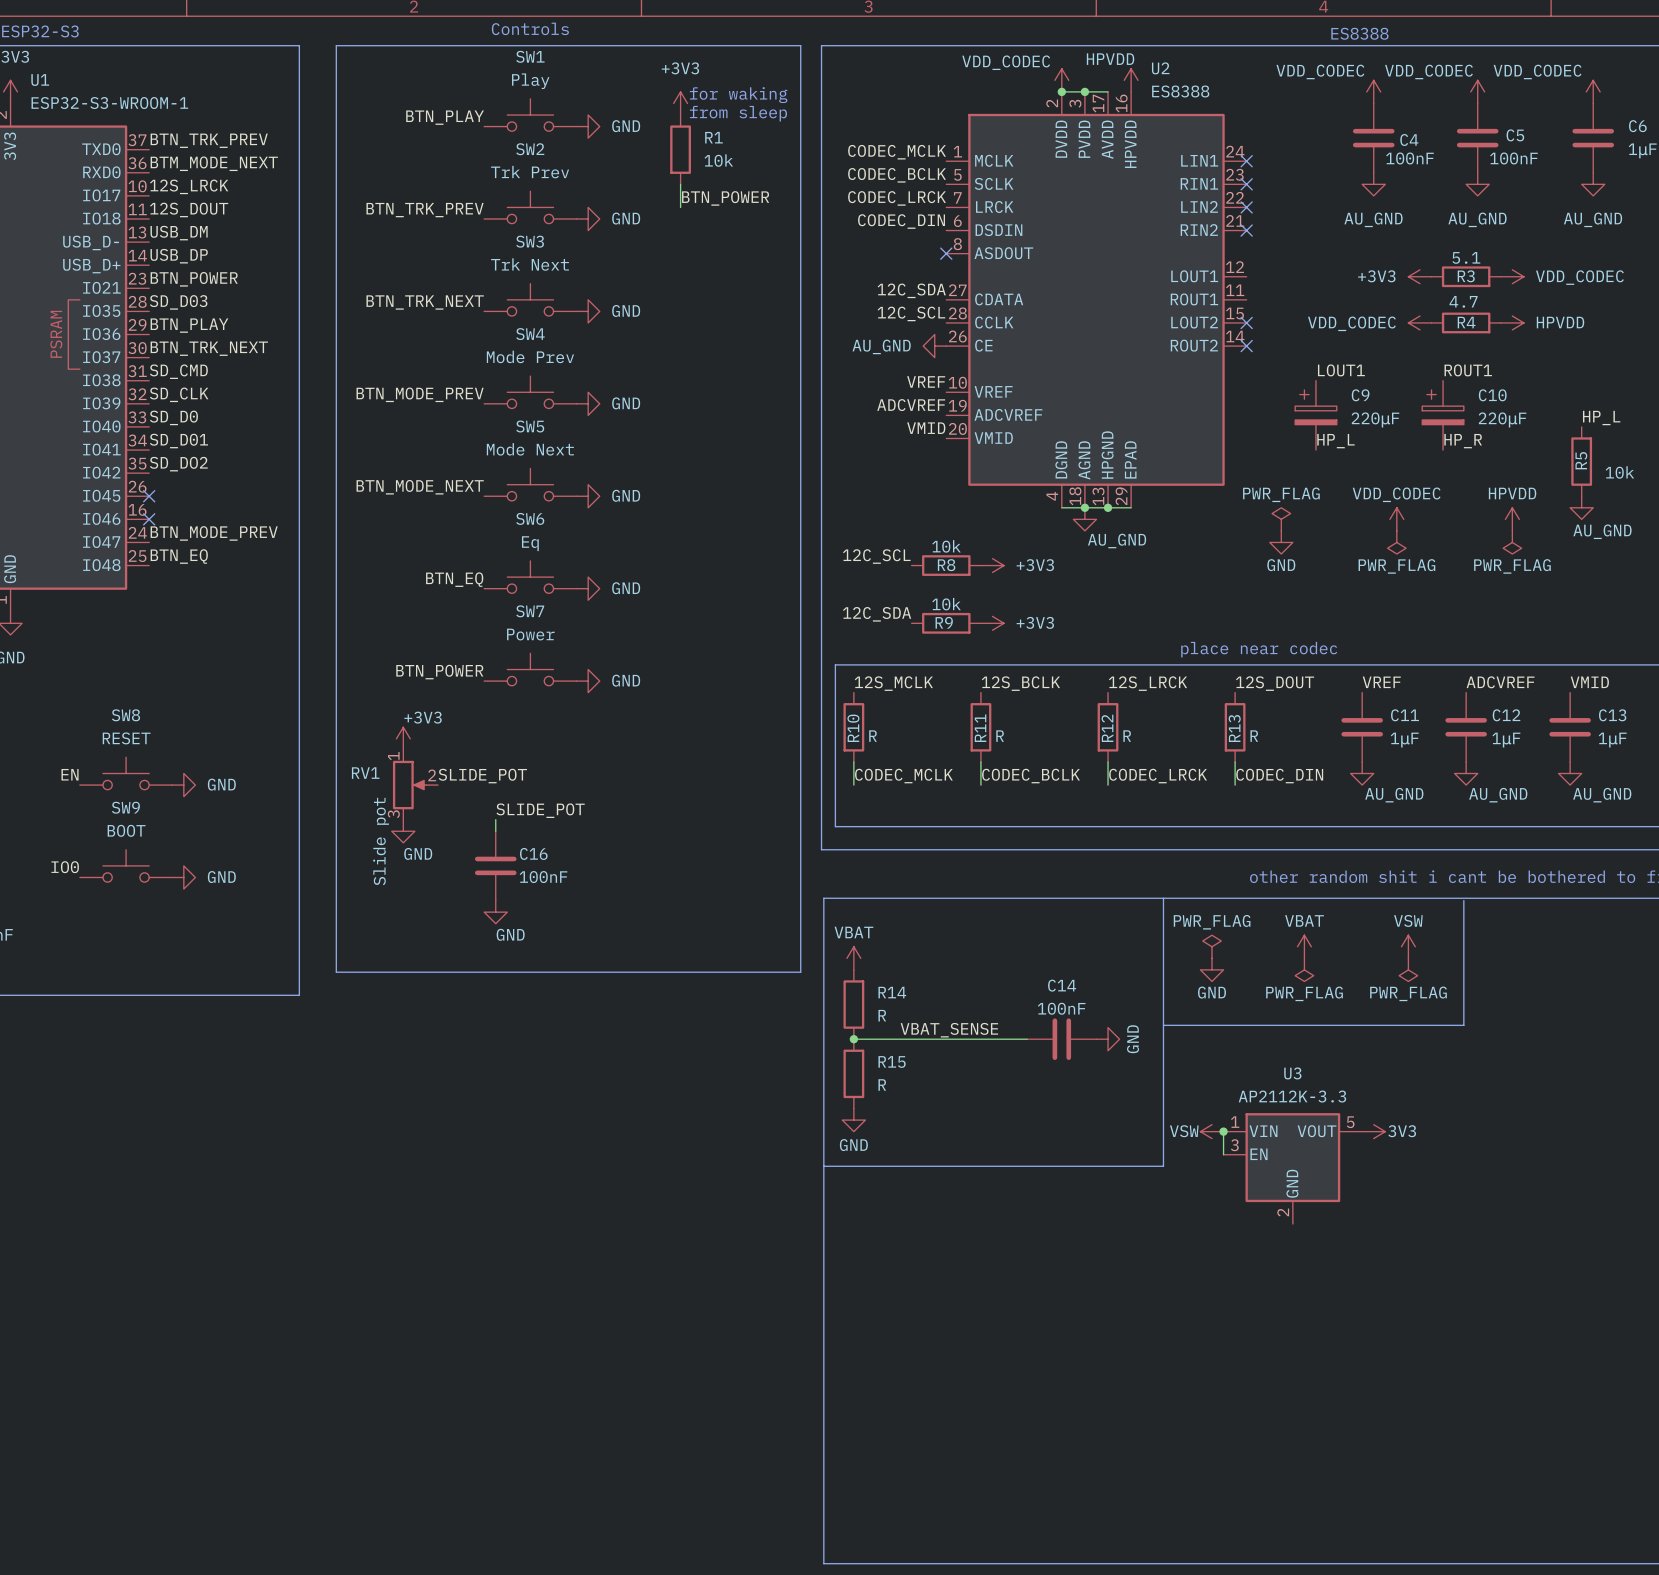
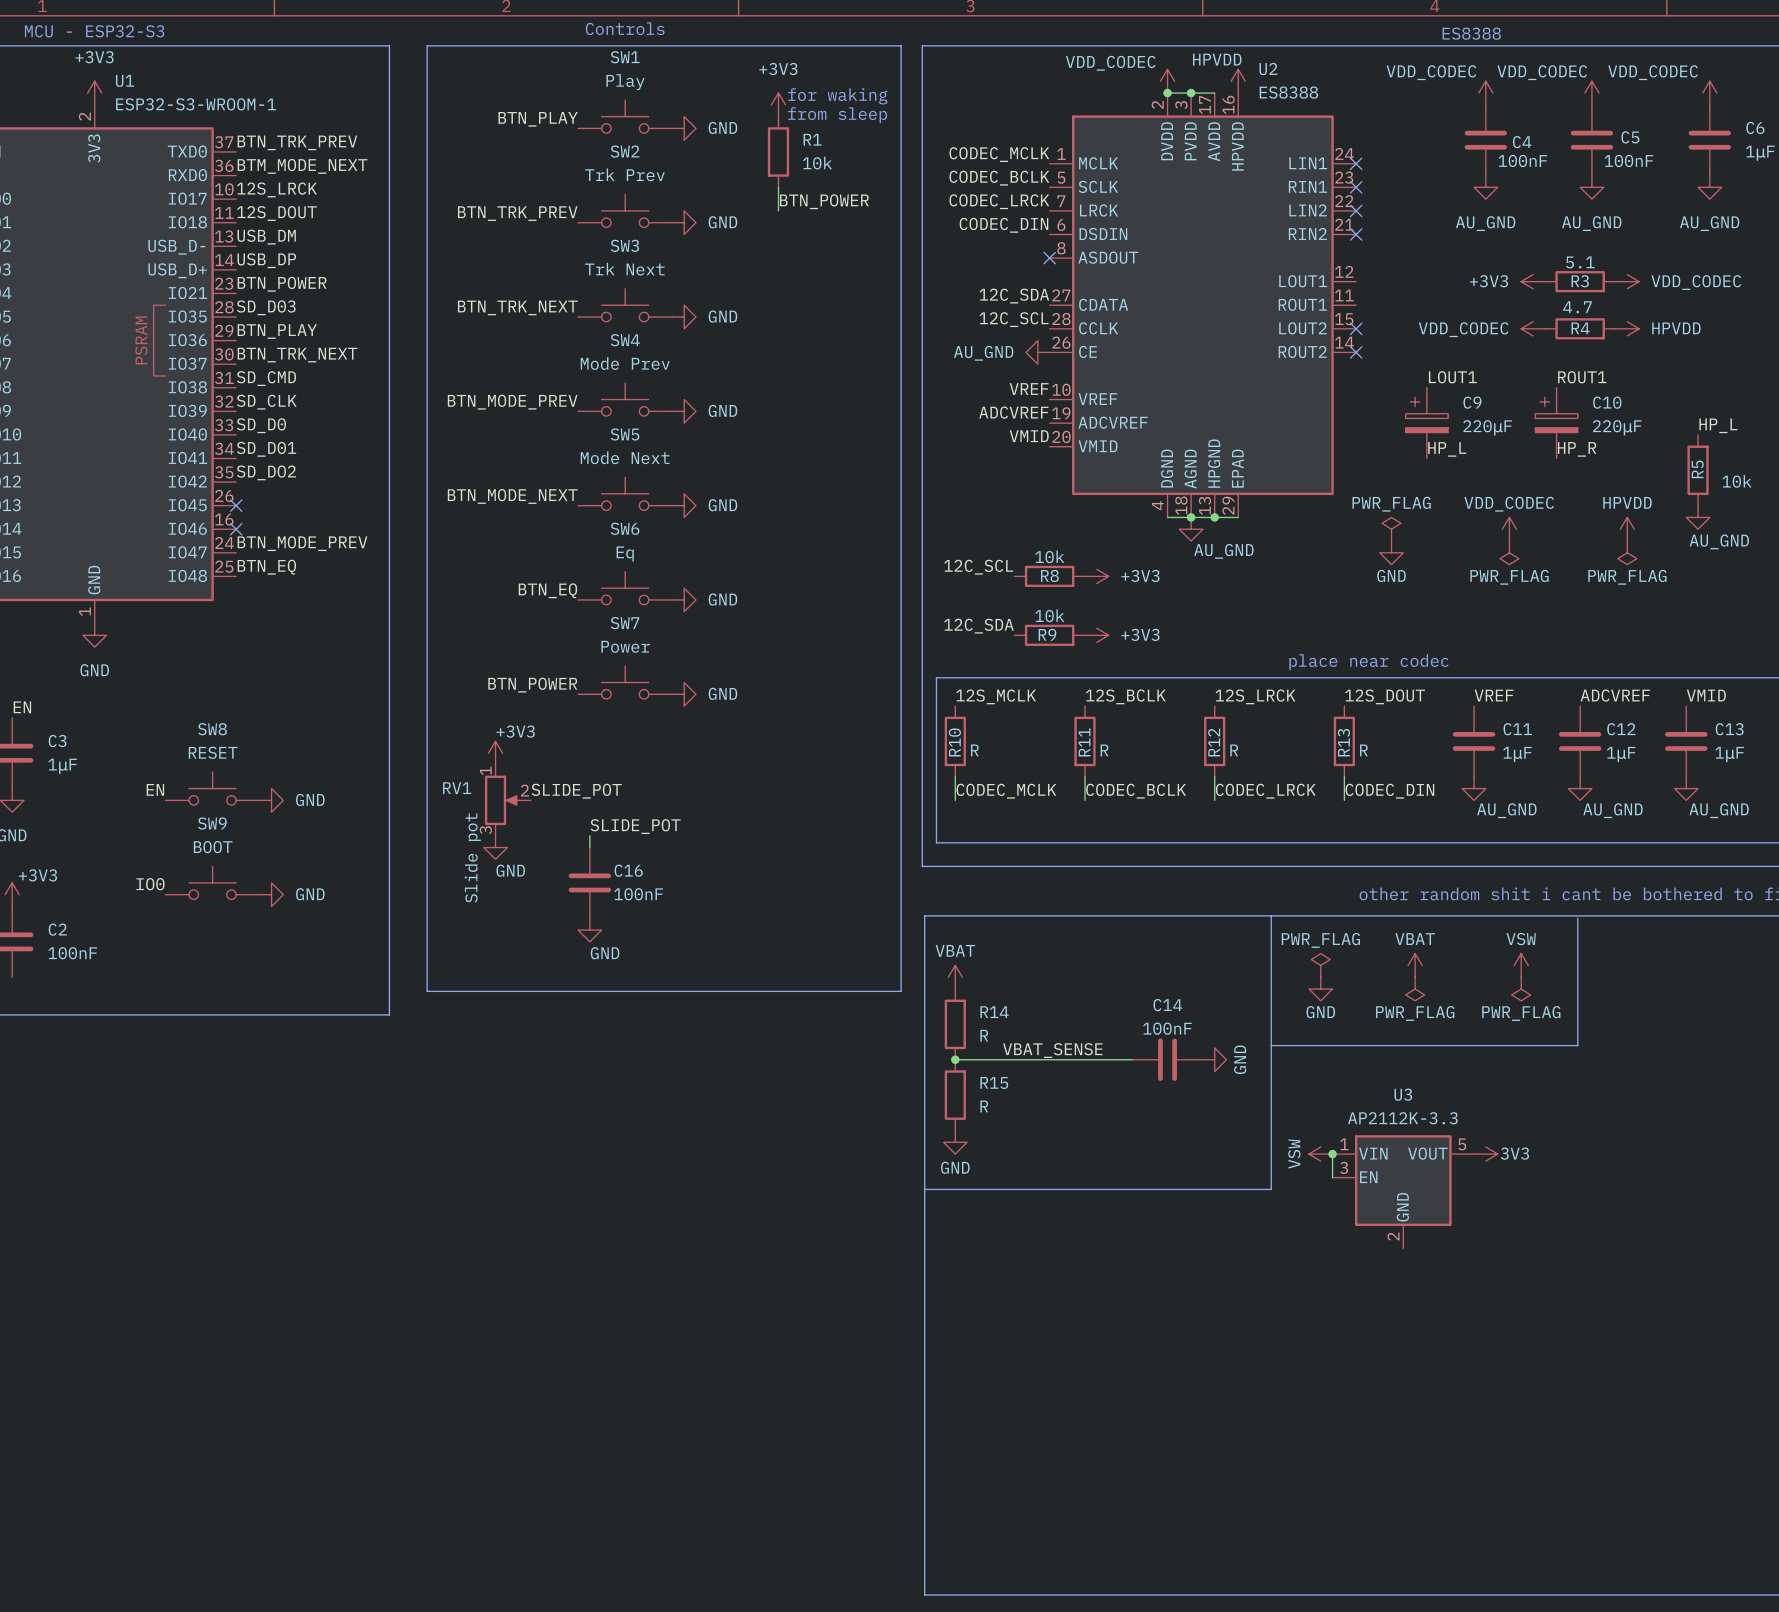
power symbol text rotation: 0° (1184, 1131) -> 90° counterclockwise (1294, 1154)

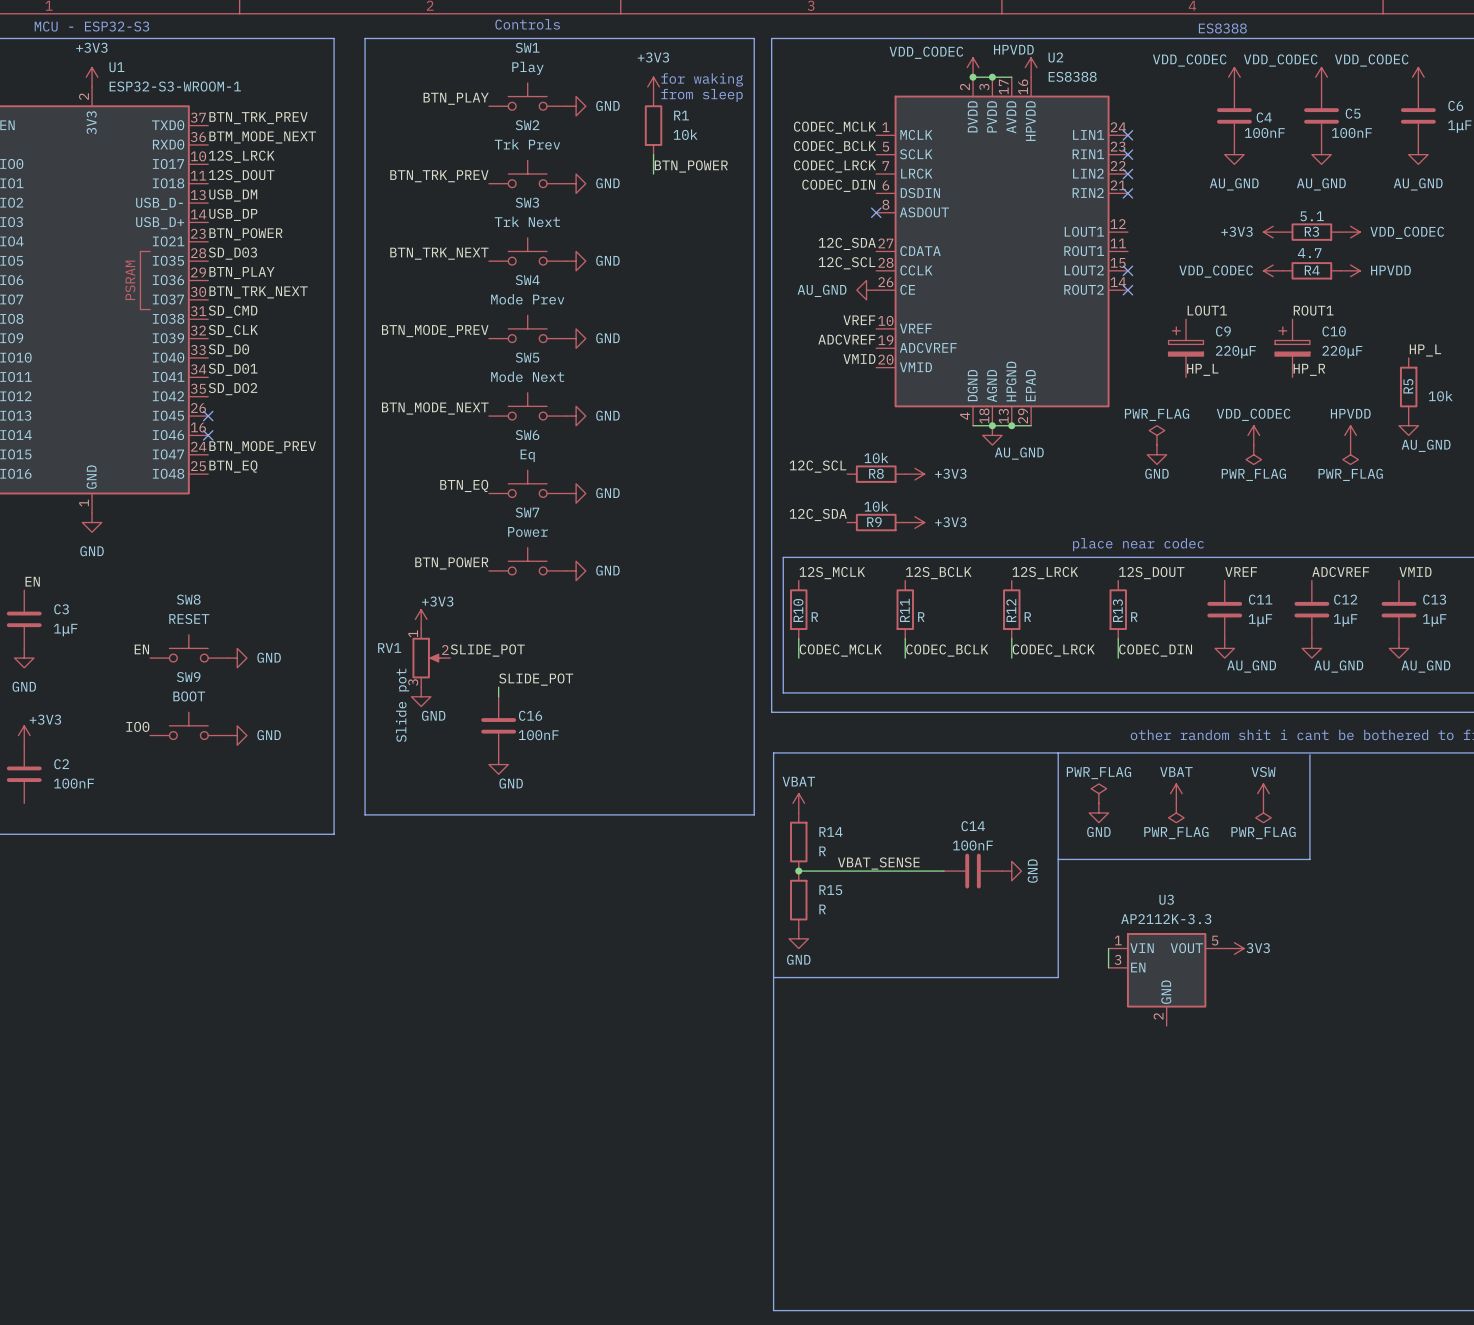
power symbol: VSW (1320, 1154) -> none
junction: (1332, 1154) -> none

